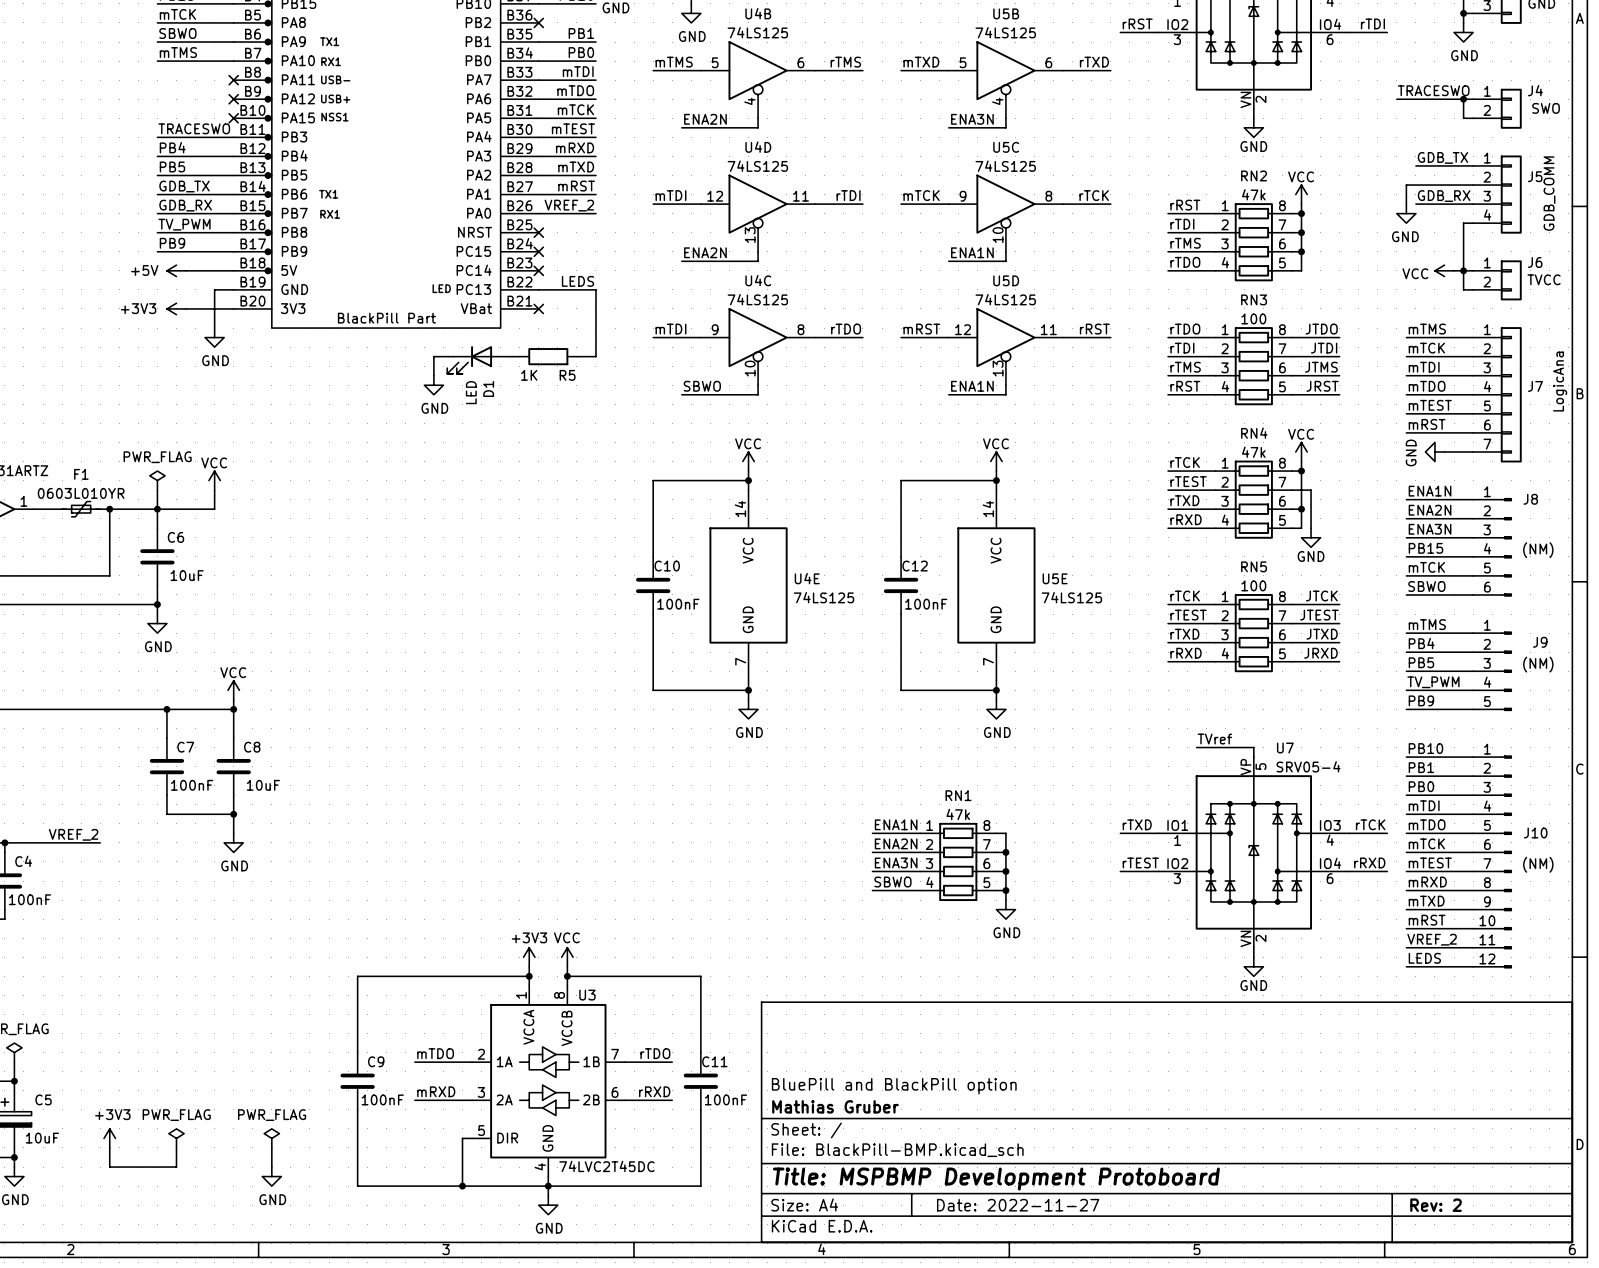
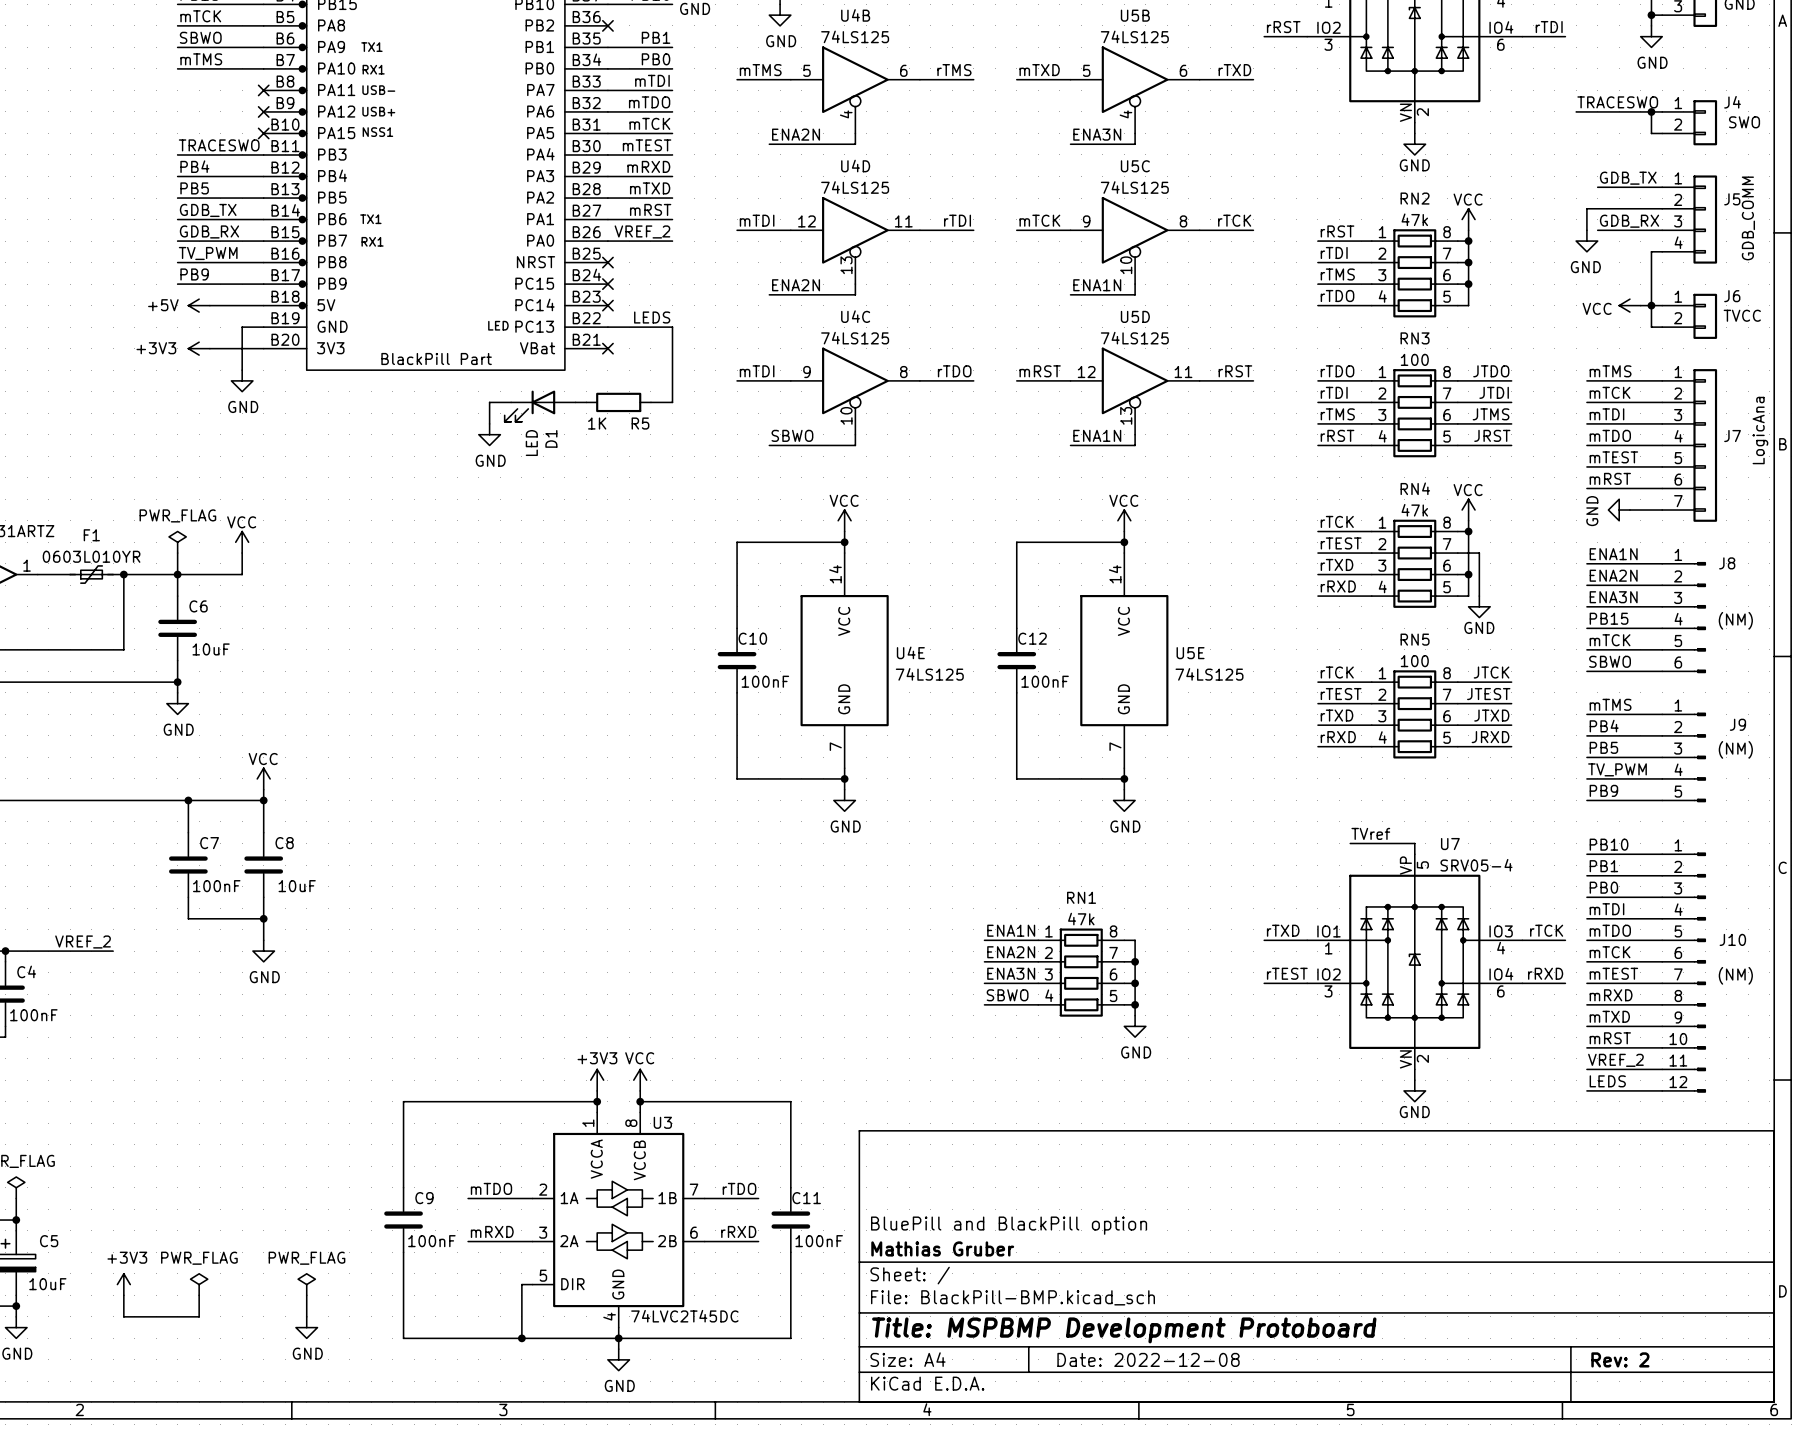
title block: Date: 2022-11-27 (1018, 1205) -> Date: 2022-12-08 (1148, 1359)

